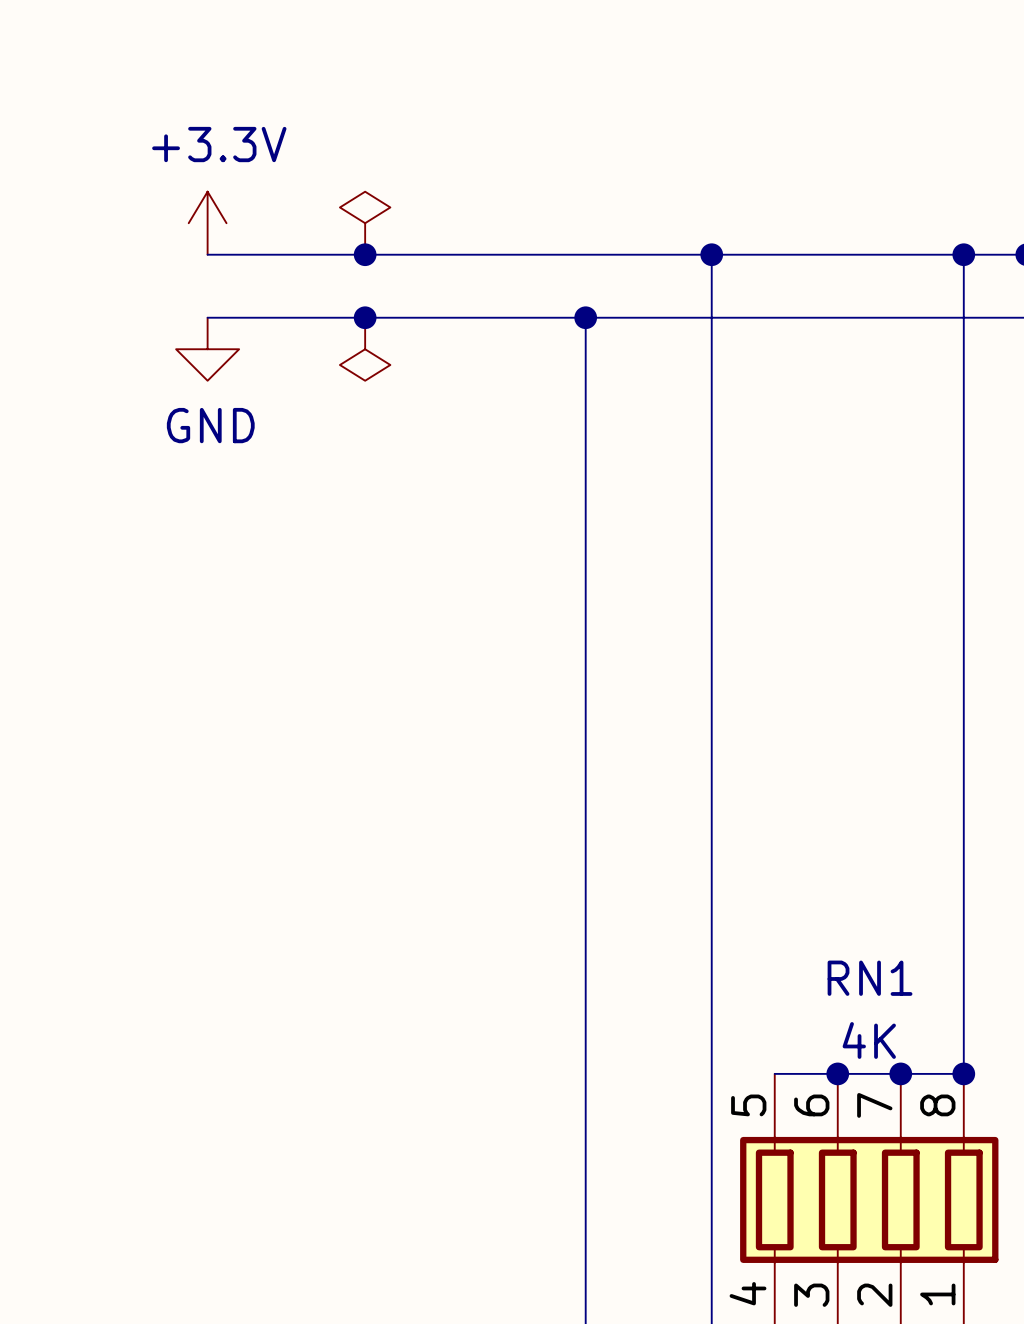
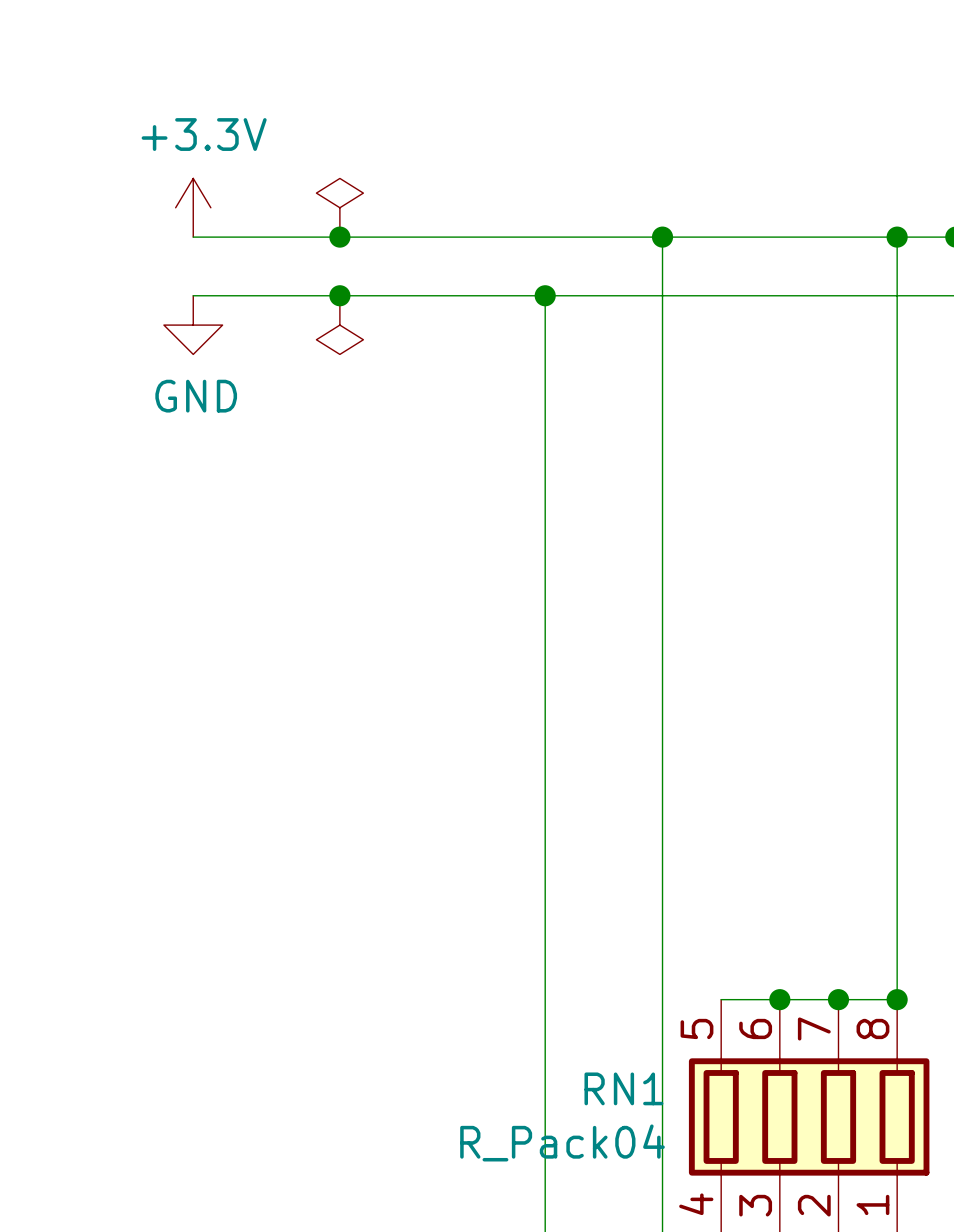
RN1 name position: RN1 (870, 978) -> RN1 (623, 1088)
RN1 value: 4K (869, 1040) -> R_Pack04 (562, 1142)

